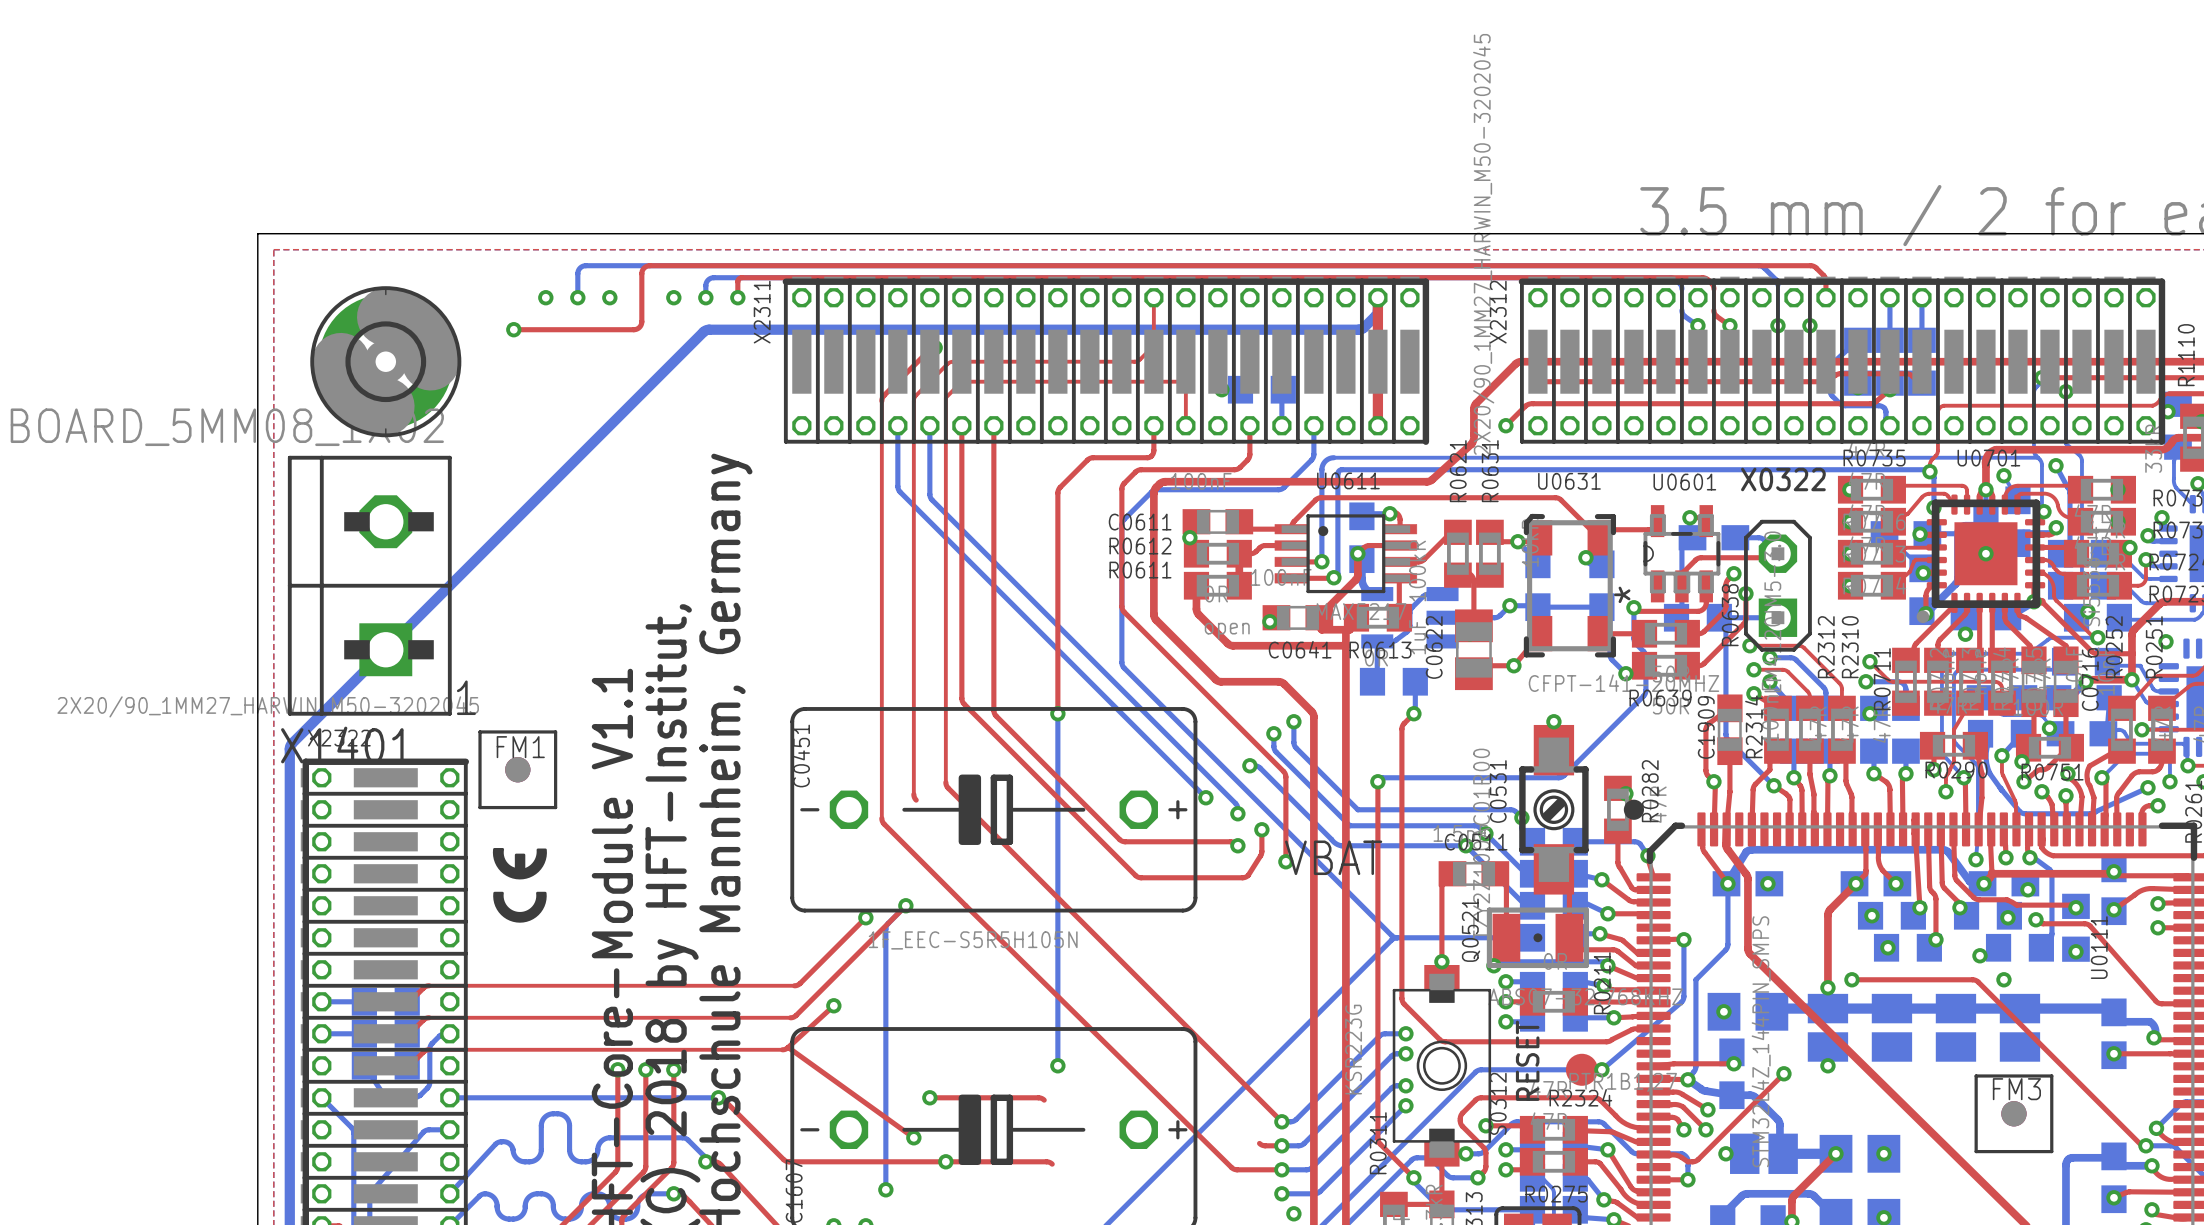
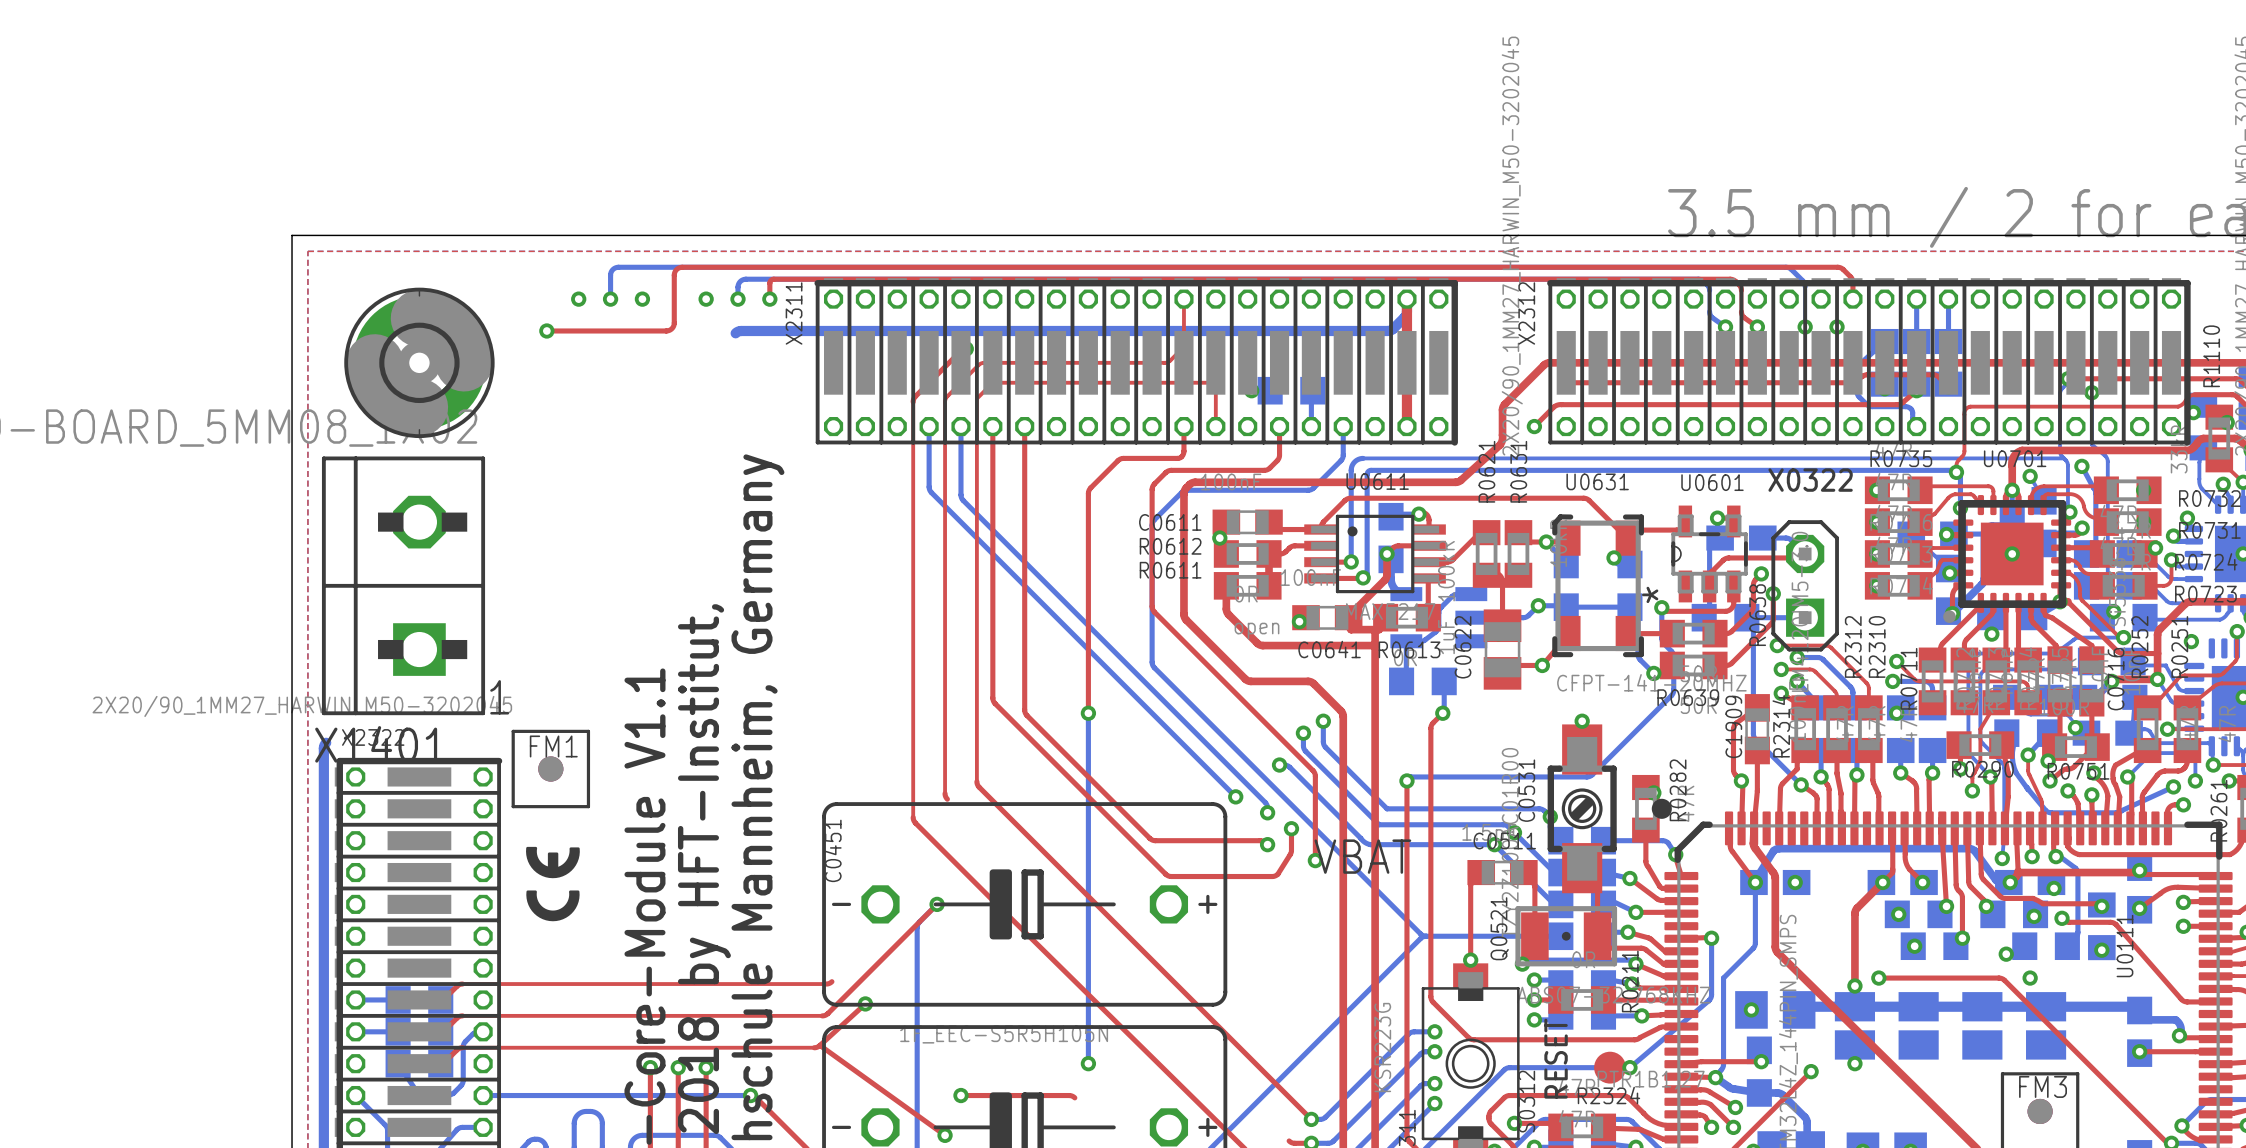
bottom track: (703, 332) (292, 743) -> none
C0451 position: (993, 809) -> (1024, 904)
top track: (865, 917) (800, 983) -> none
via: (865, 917) -> none

